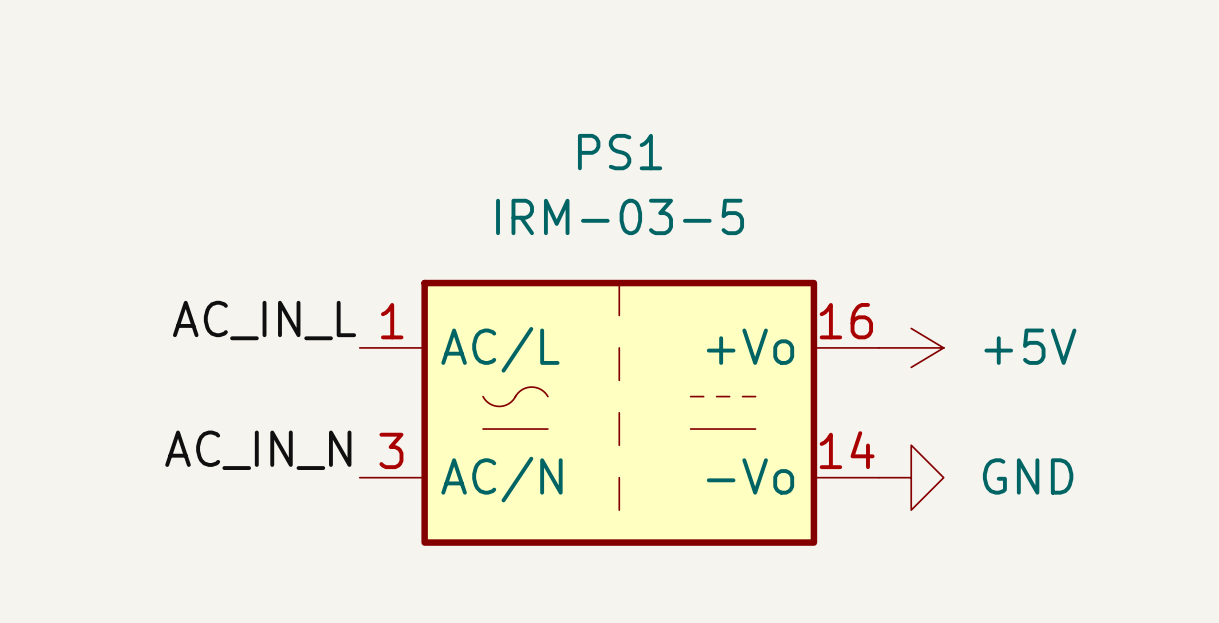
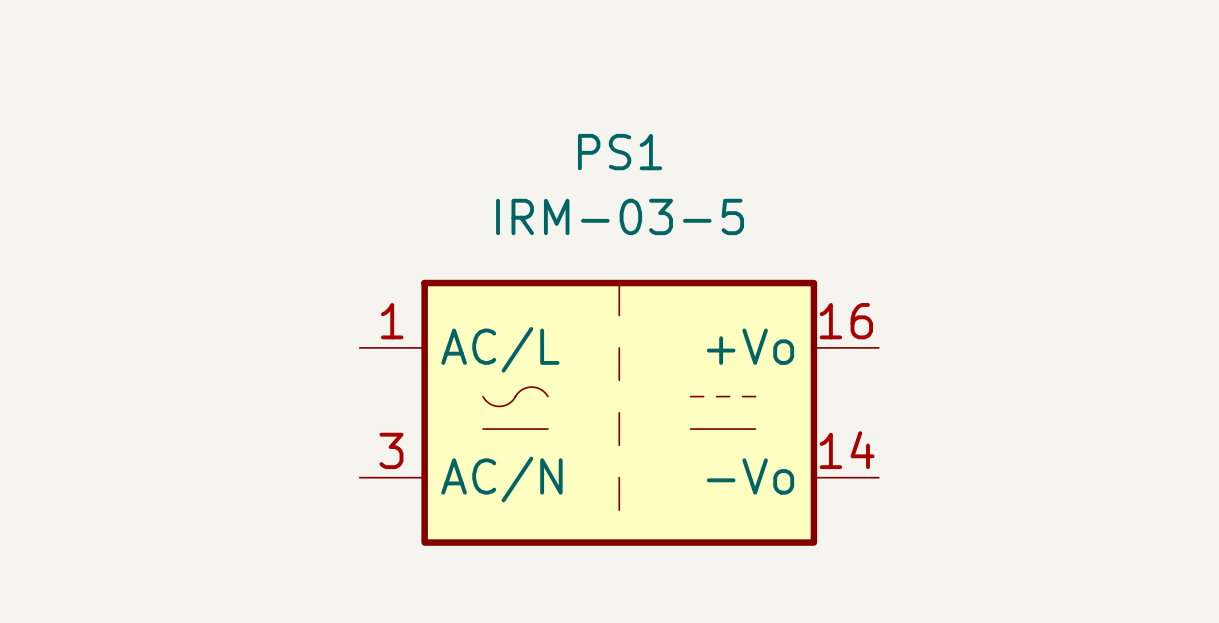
label: AC_IN_L (264, 320) -> none
power symbol: +5V (911, 347) -> none
label: AC_IN_N (258, 450) -> none
power symbol: GND (911, 477) -> none

